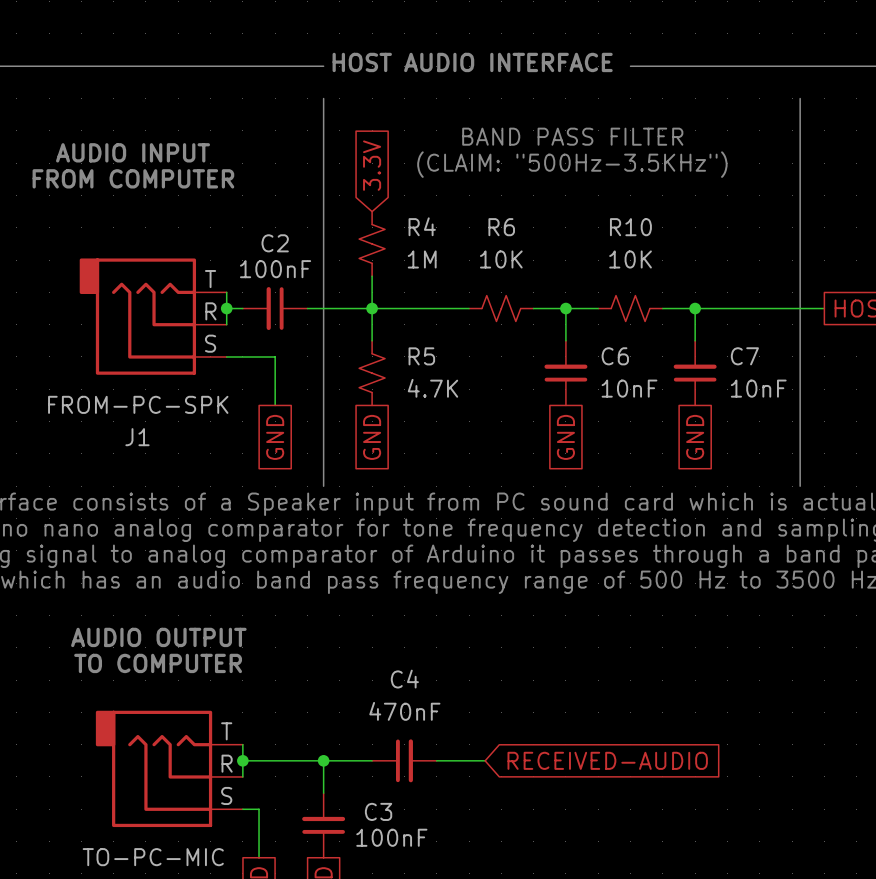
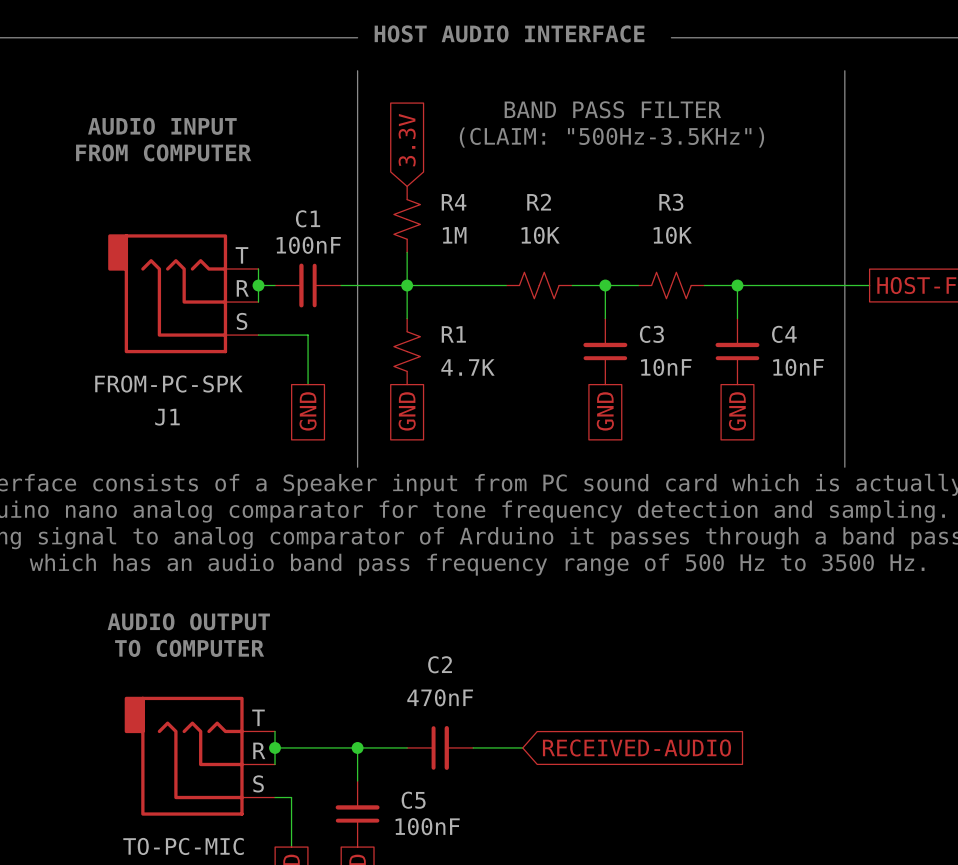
R6 name: R6 (501, 227) -> R2 (539, 202)
R10 name: R10 (630, 227) -> R3 (671, 202)
C2 name: C2 (275, 243) -> C1 (308, 218)
R5 name: R5 (421, 356) -> R1 (453, 334)
C6 name: C6 (615, 356) -> C3 (651, 334)
C7 name: C7 (744, 356) -> C4 (784, 334)
C4 name: C4 (404, 679) -> C2 (440, 664)
C3 name: C3 (378, 811) -> C5 (413, 800)

